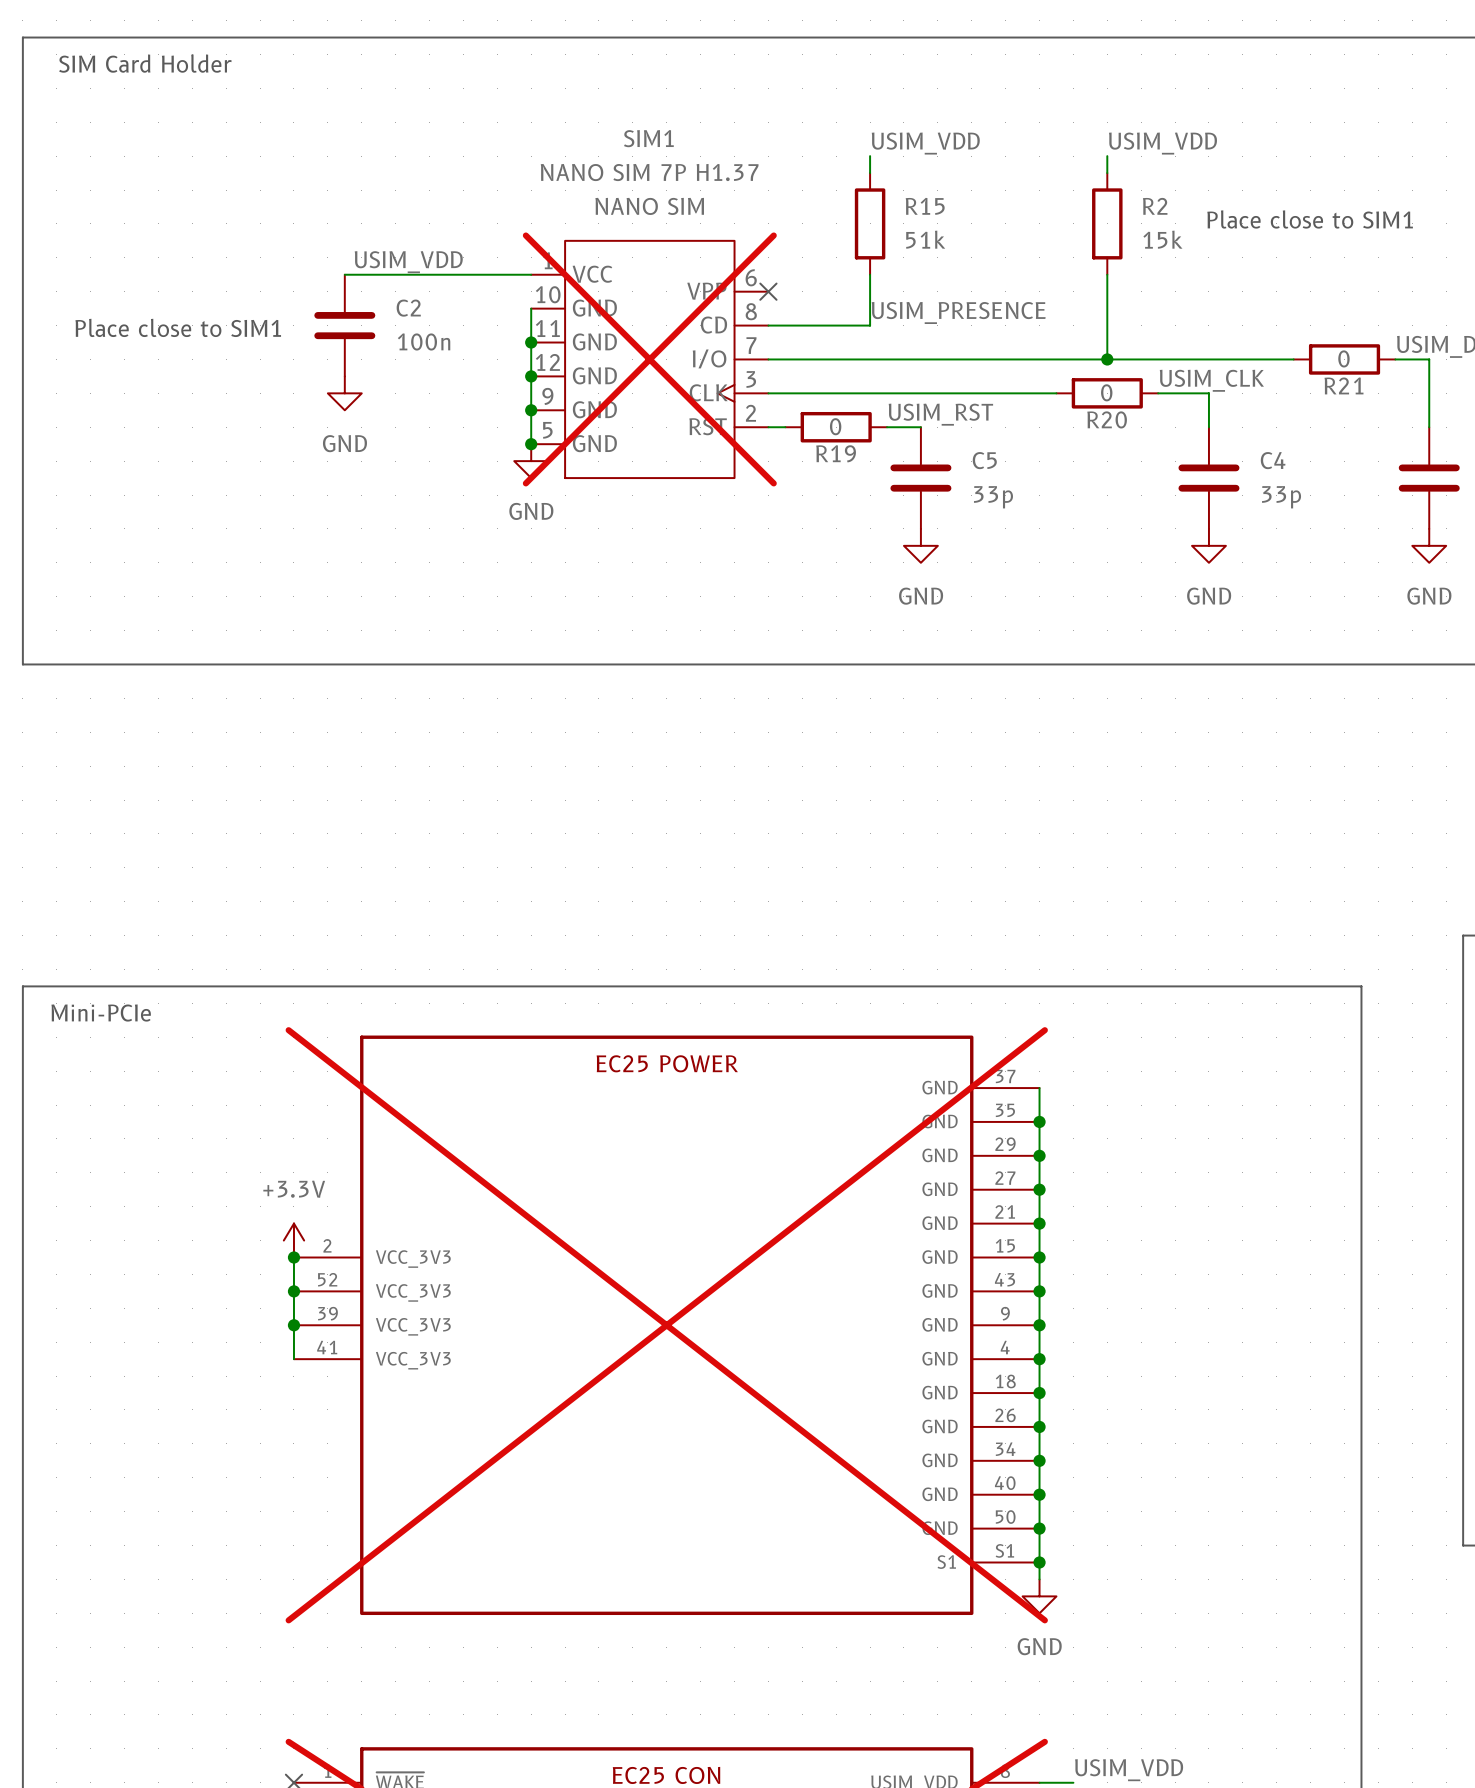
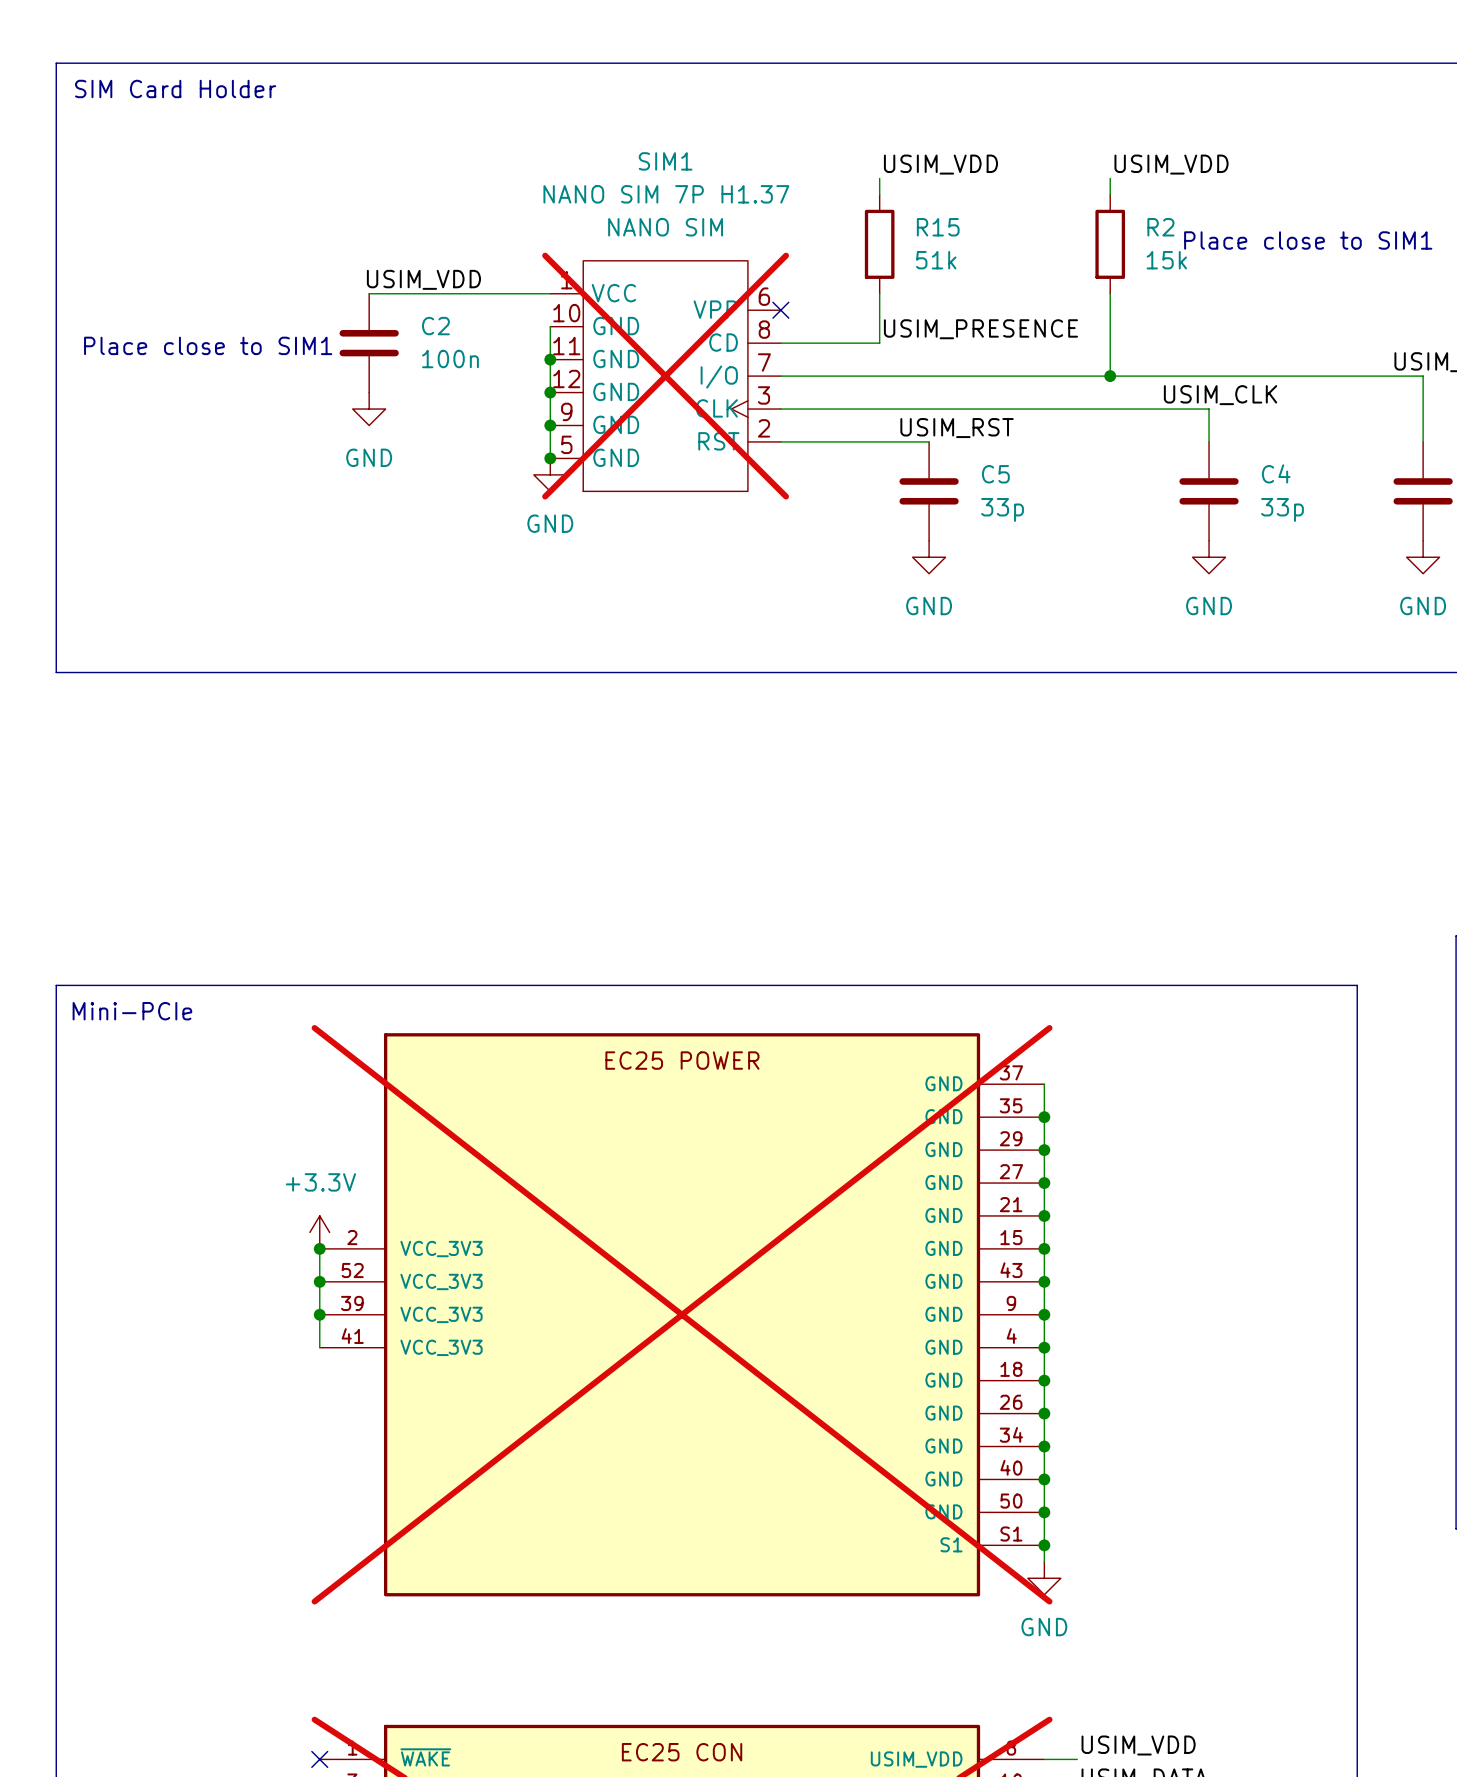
wire: none -> (1291, 376) (1390, 376)
R21: 0 (1344, 359) -> none
wire: none -> (1060, 409) (1159, 409)
R20: 0 (1107, 393) -> none
wire: none -> (797, 441) (896, 441)
R19: 0 (836, 427) -> none

